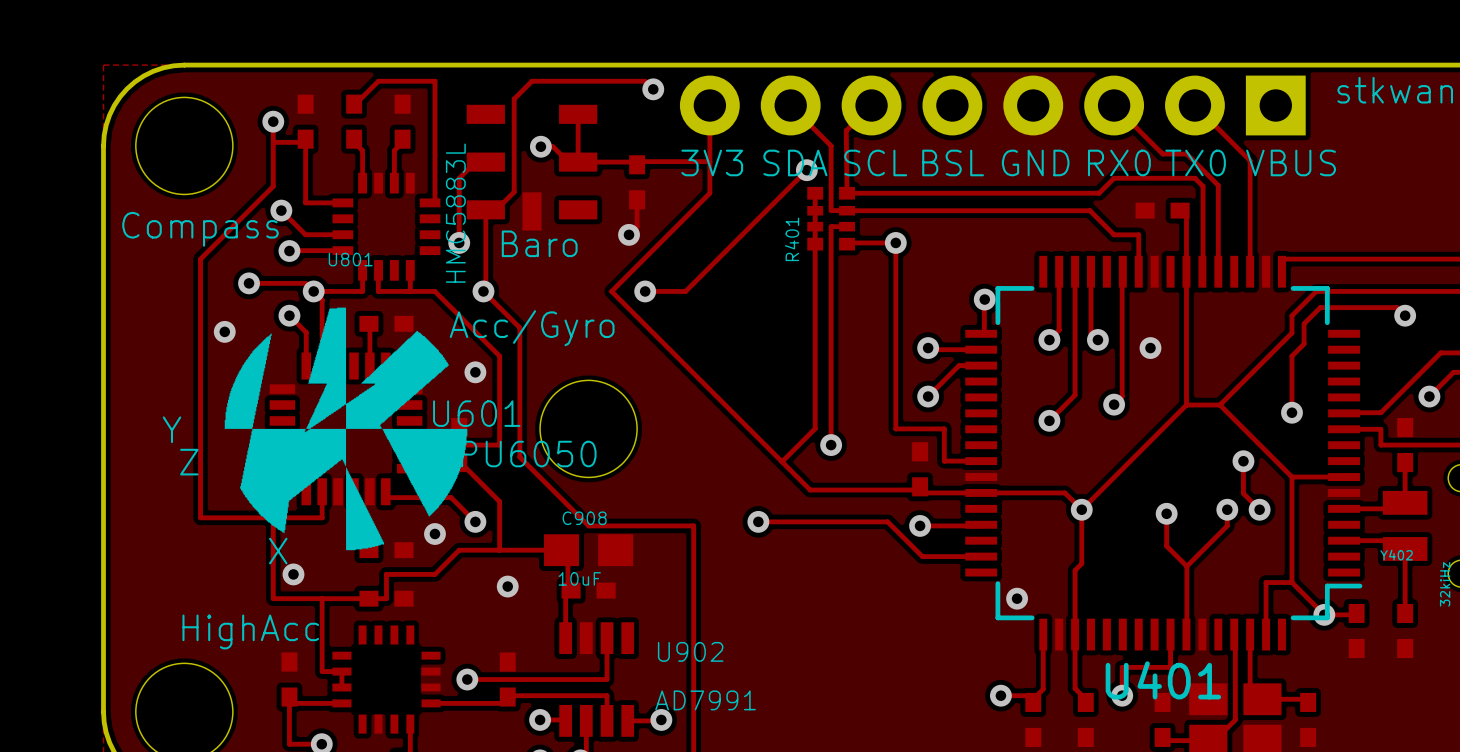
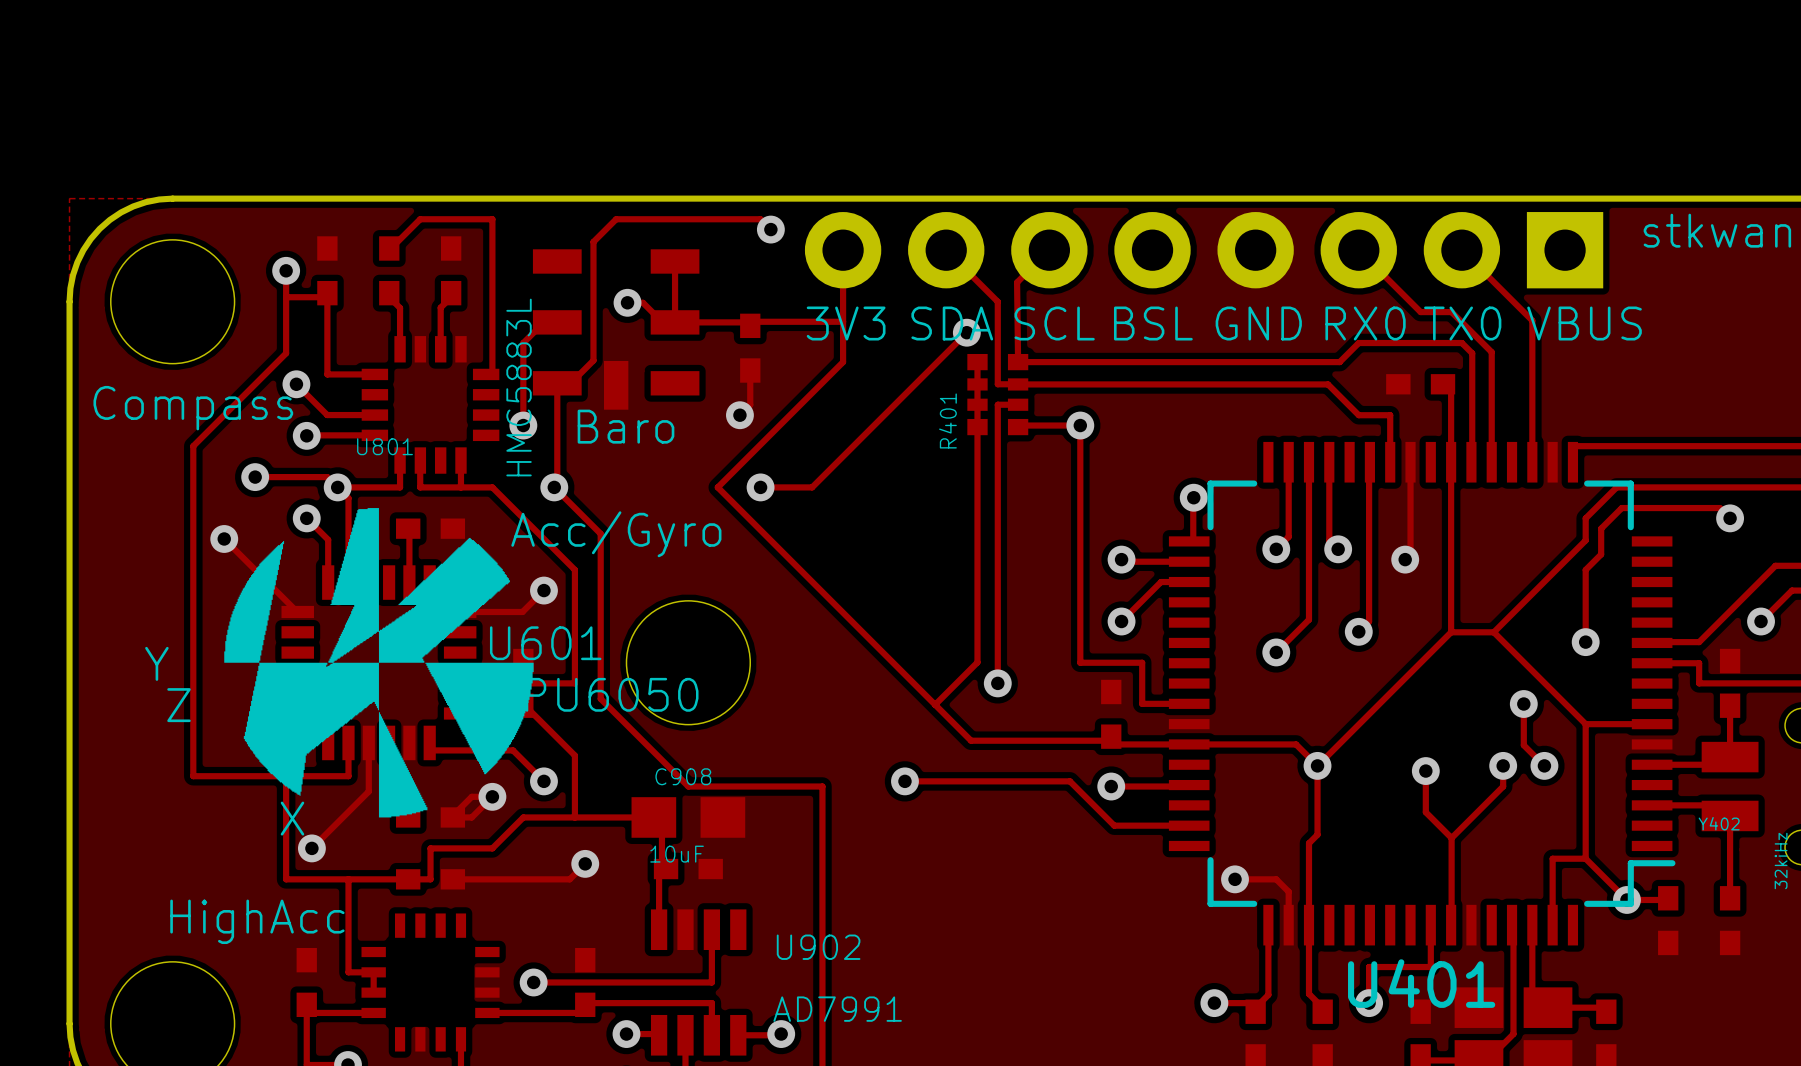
track: none -> (1410, 462) (1410, 554) (1405, 559)
track: none -> (224, 538) (297, 611)
track: none -> (543, 590) (522, 611) (460, 611)
track: none -> (368, 742) (368, 791) (311, 848)
track: none -> (451, 817) (471, 796) (492, 796) (471, 817) (452, 817)
track: none -> (585, 863) (569, 879) (452, 879)
track: none -> (1235, 879) (1276, 879) (1288, 891) (1288, 925)

